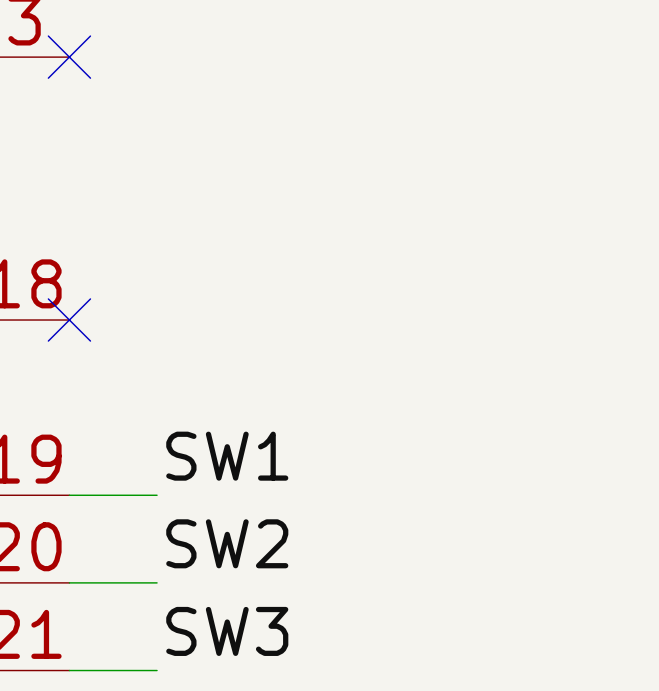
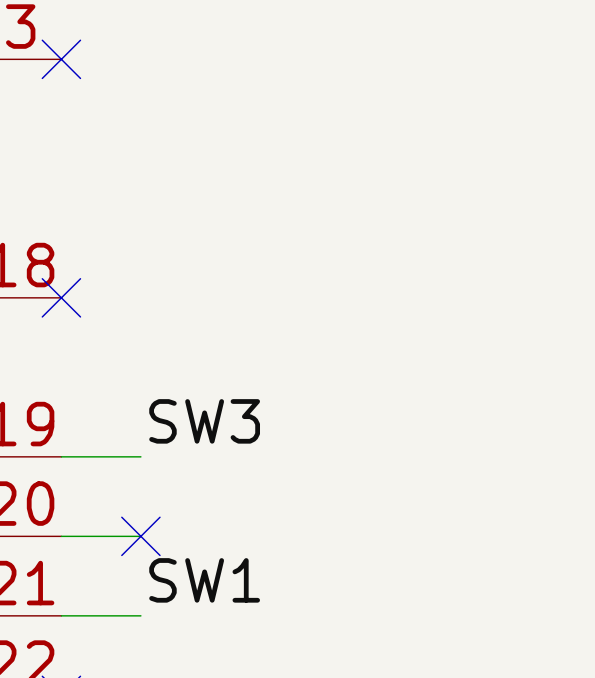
label: SW1 (227, 456) -> SW3 (204, 421)
label: SW2 (227, 543) -> none
no-connect mark: none -> (140, 536)
label: SW3 (227, 631) -> SW1 (204, 580)

